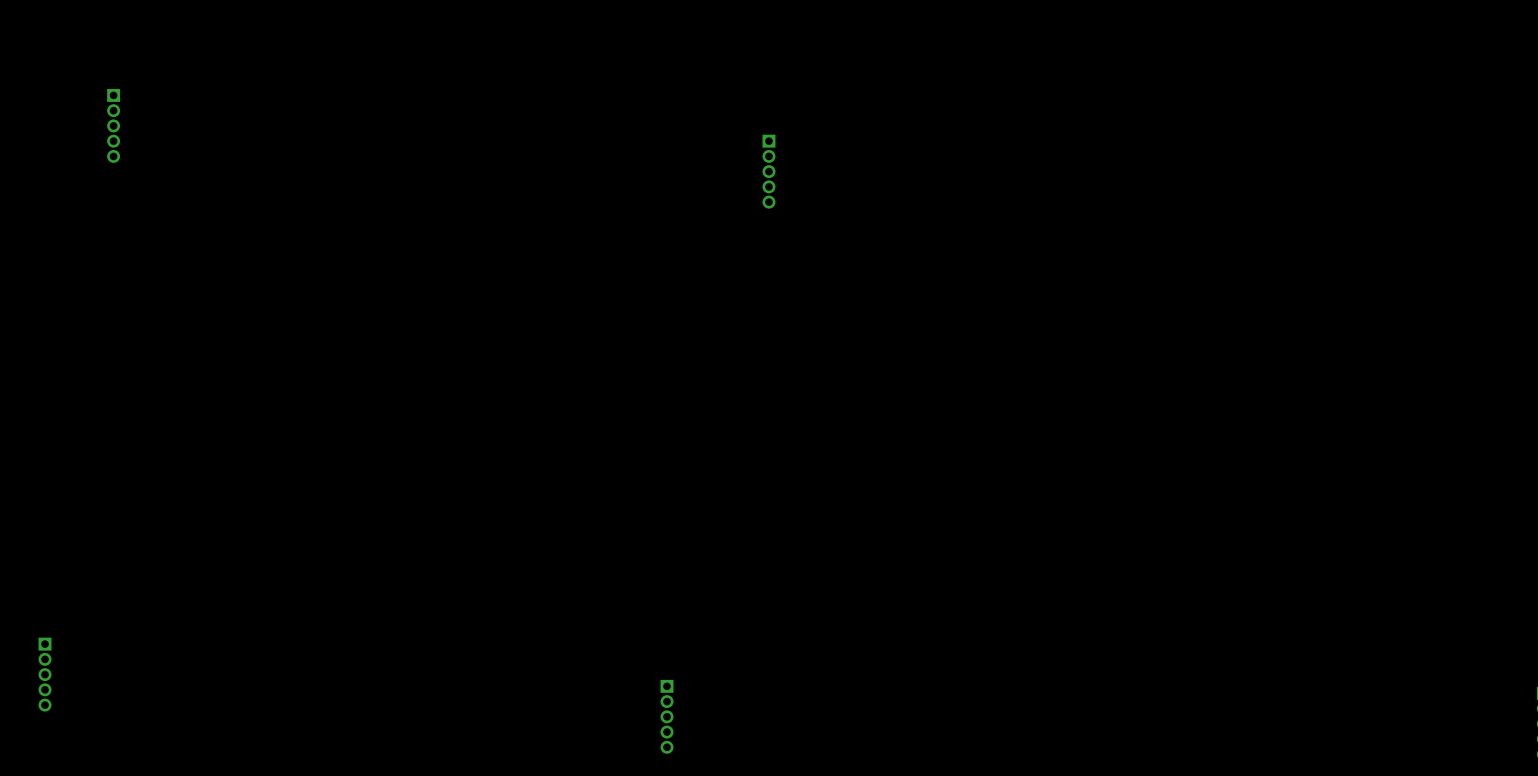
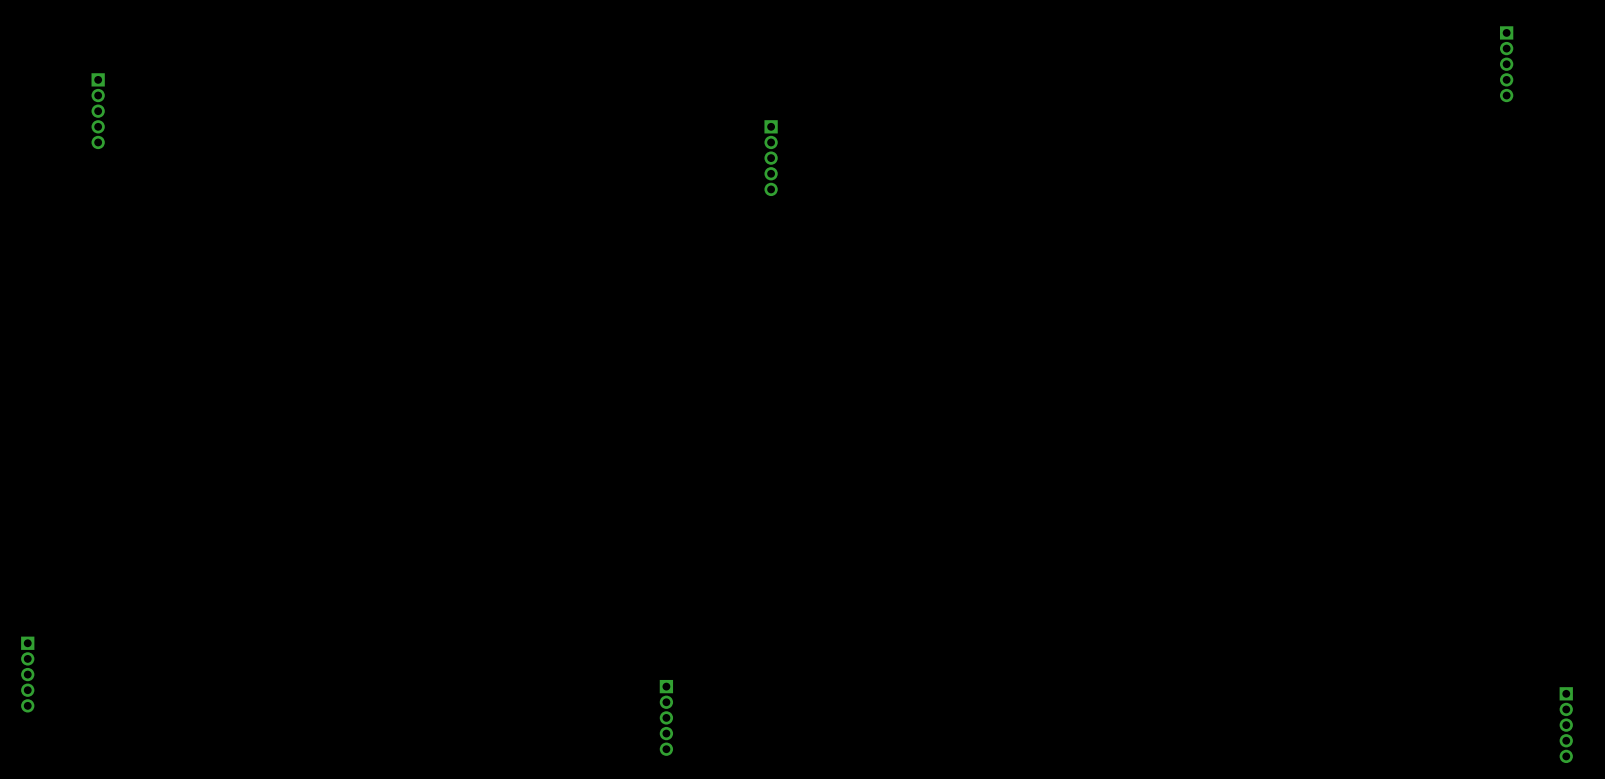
part: none -> (1506, 64)

